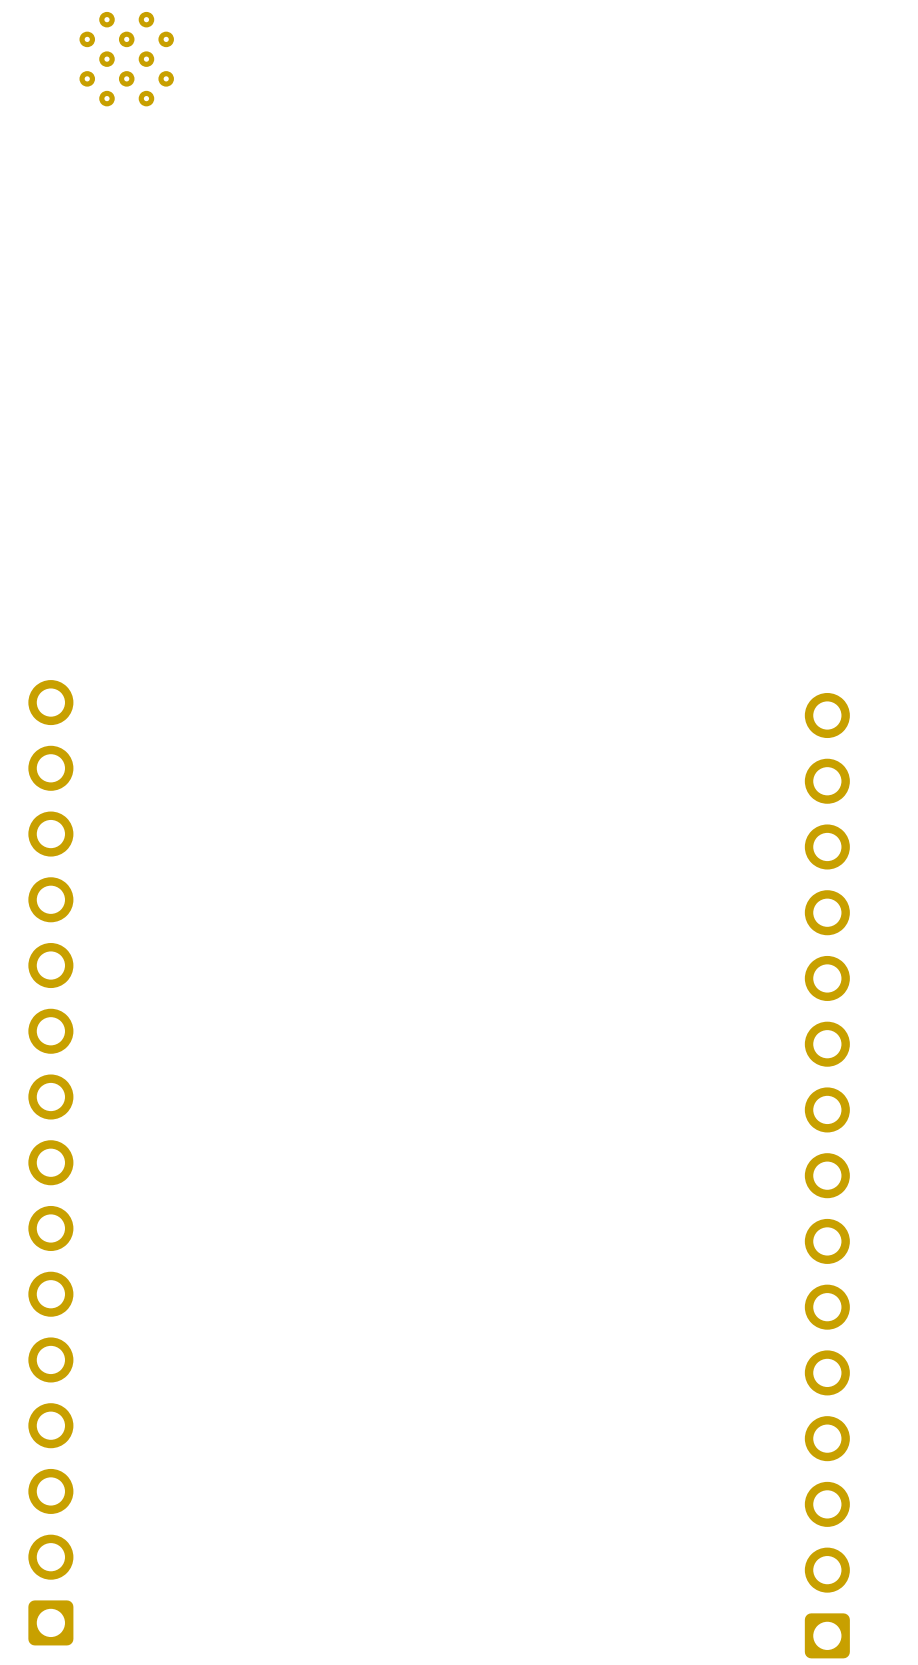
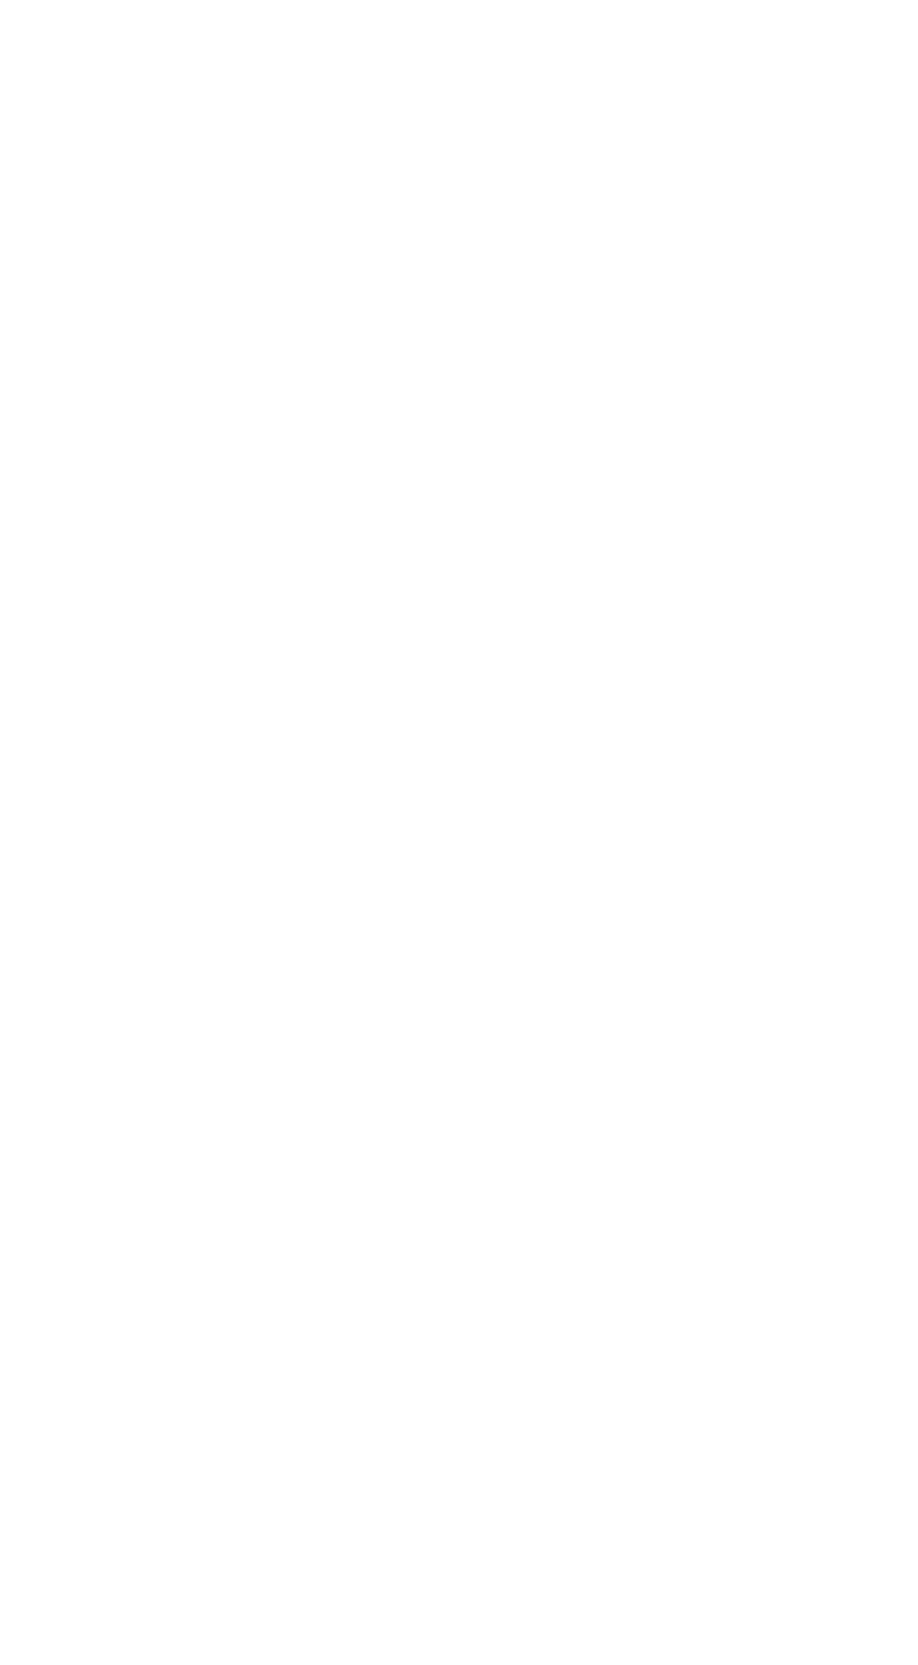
part: (126, 59) -> none
part: (50, 1162) -> none
part: (827, 1175) -> none

